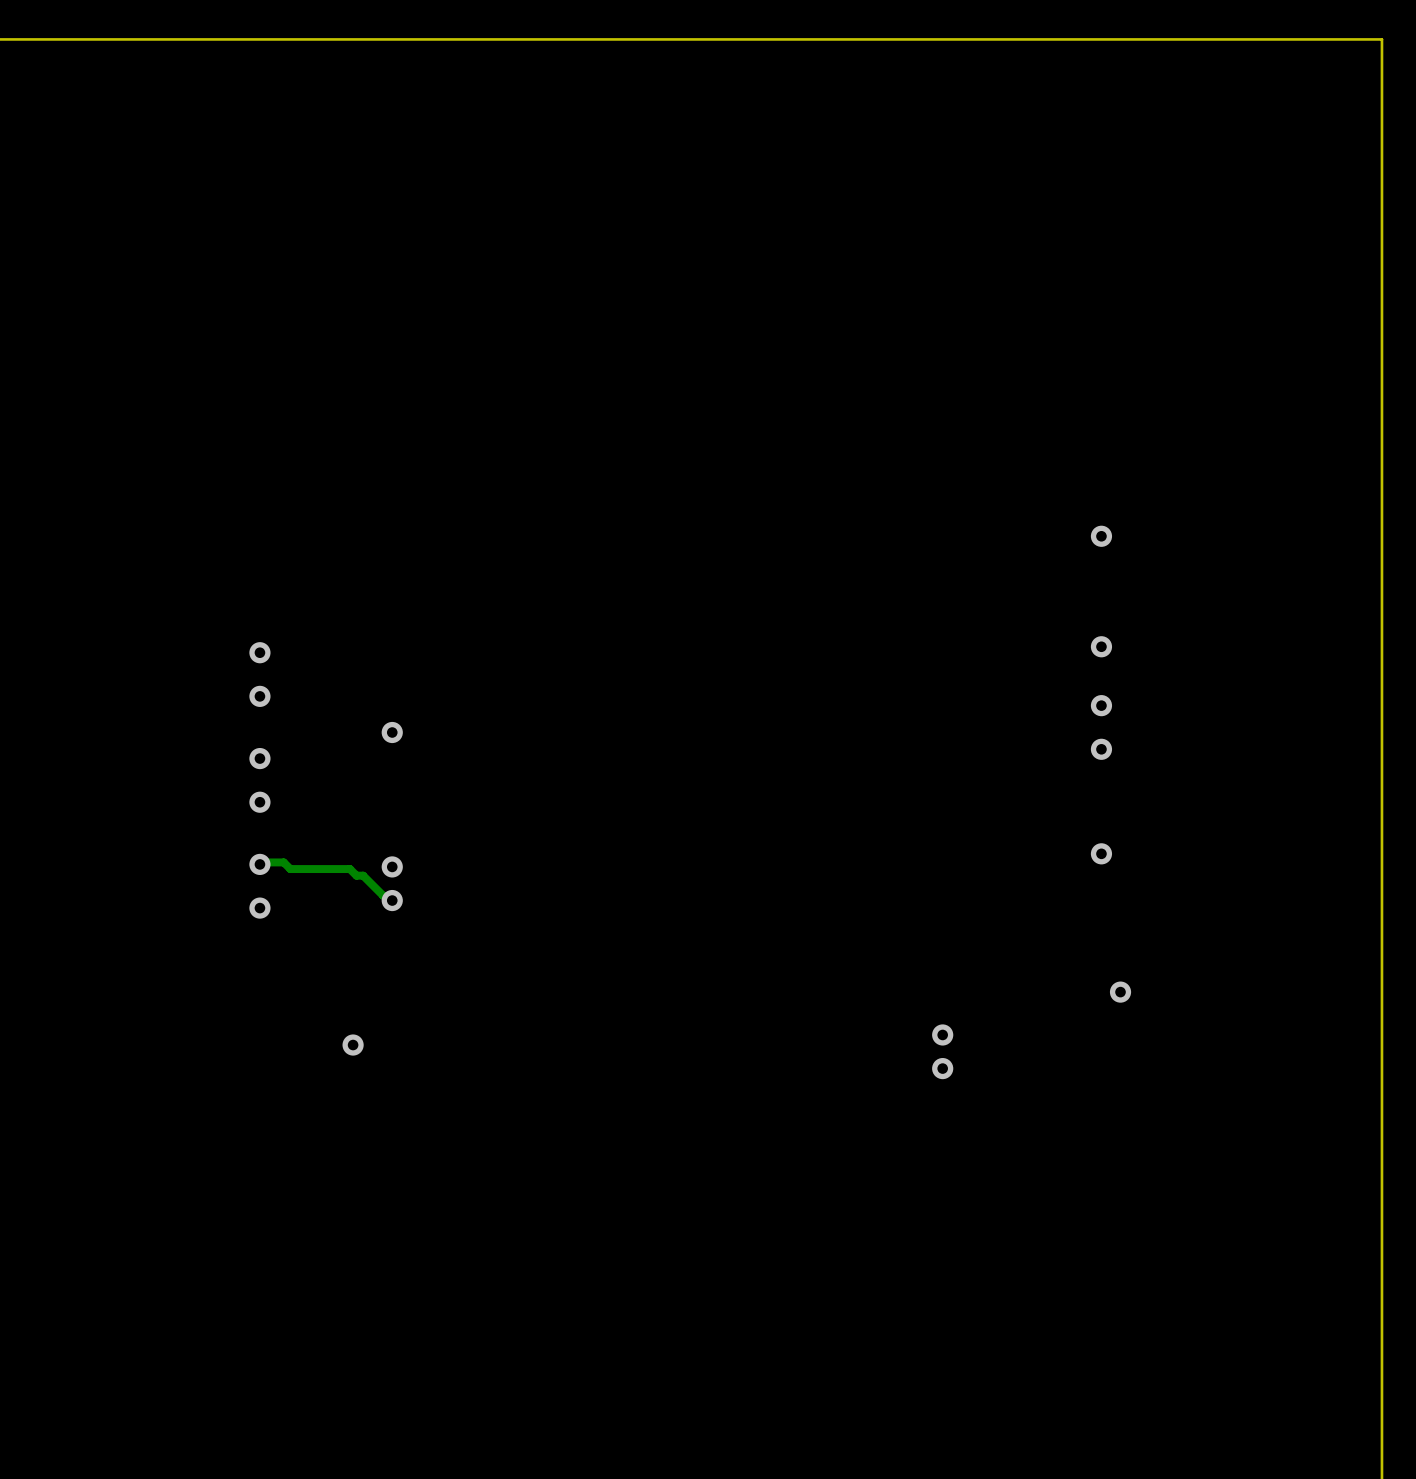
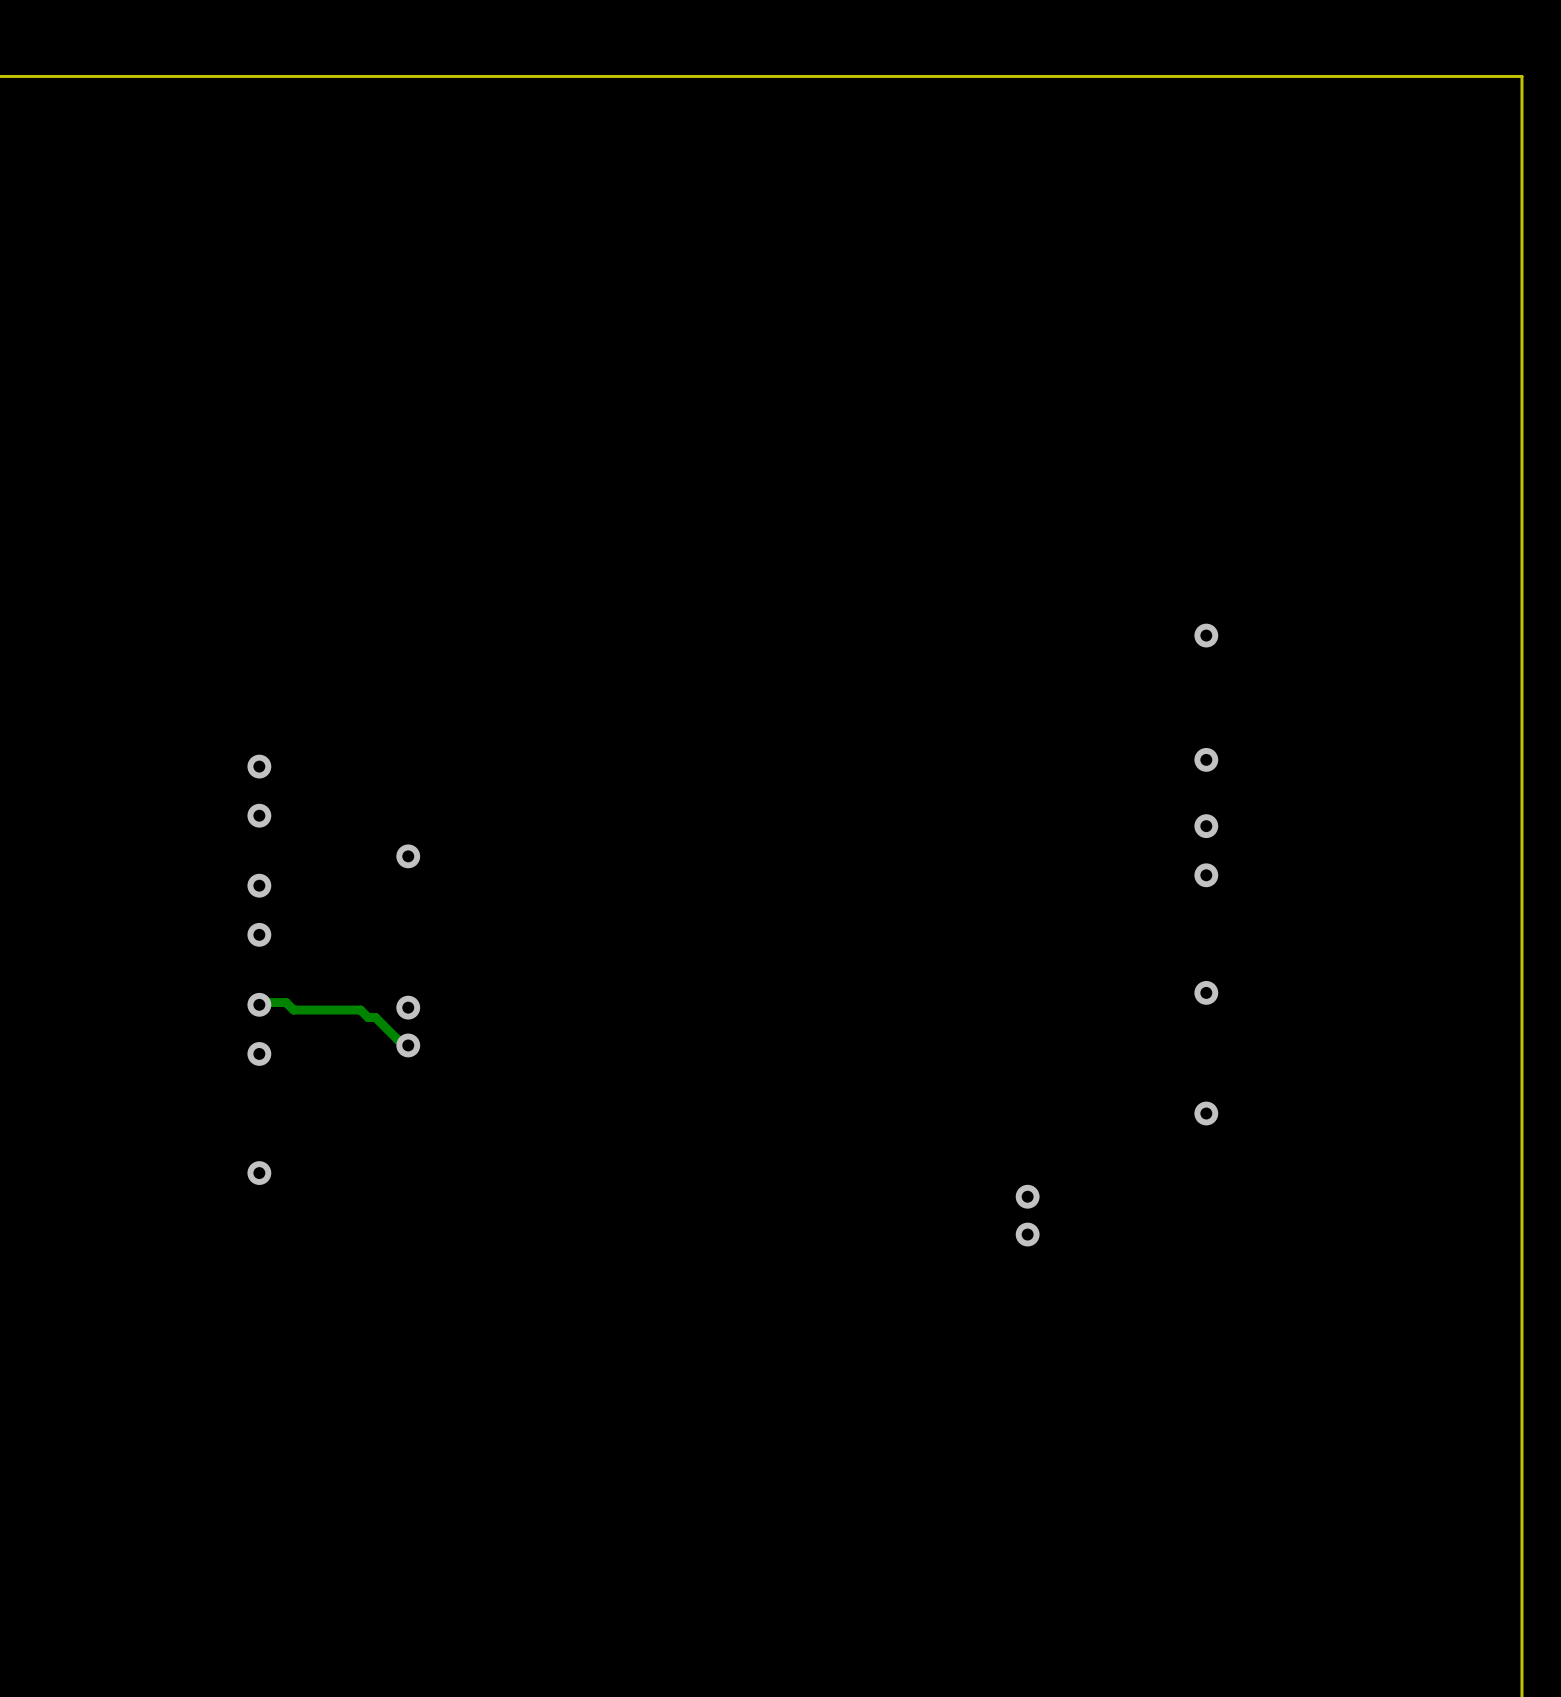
via position: (1120, 992) -> (1206, 1113)
via position: (353, 1045) -> (259, 1173)

